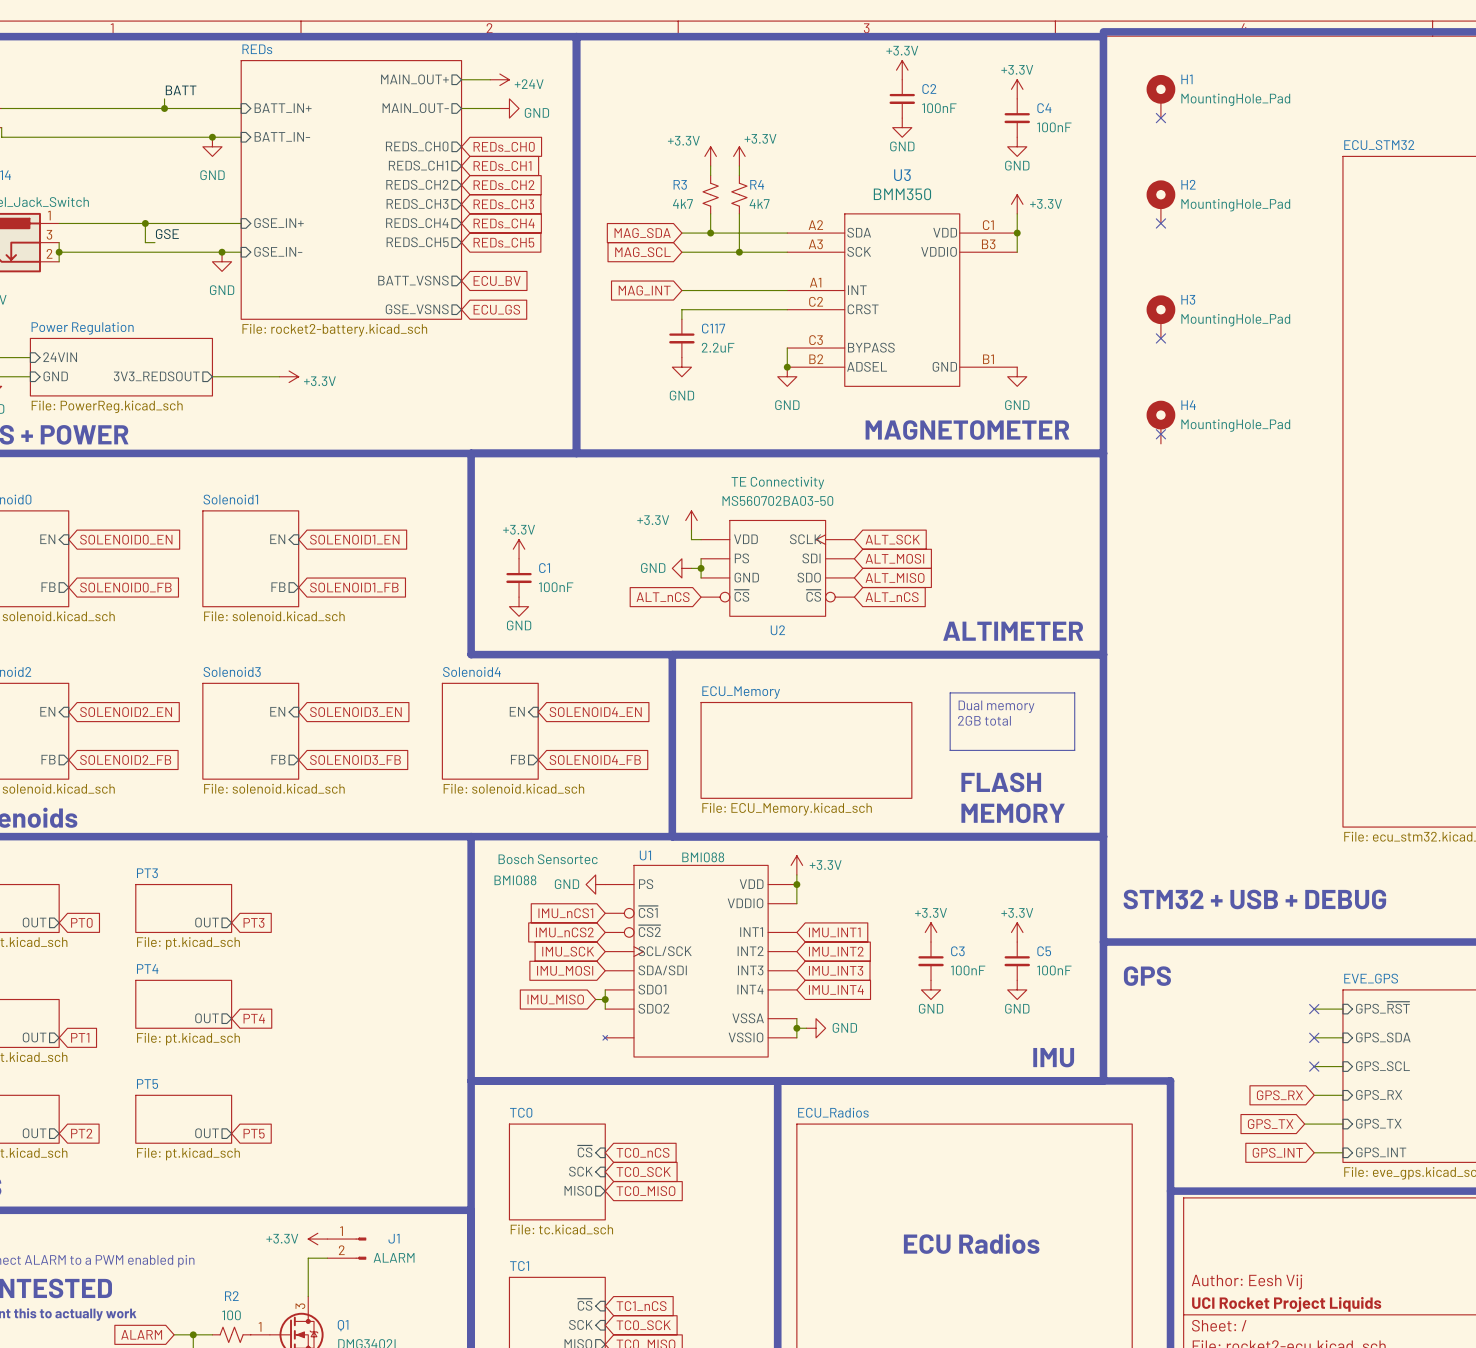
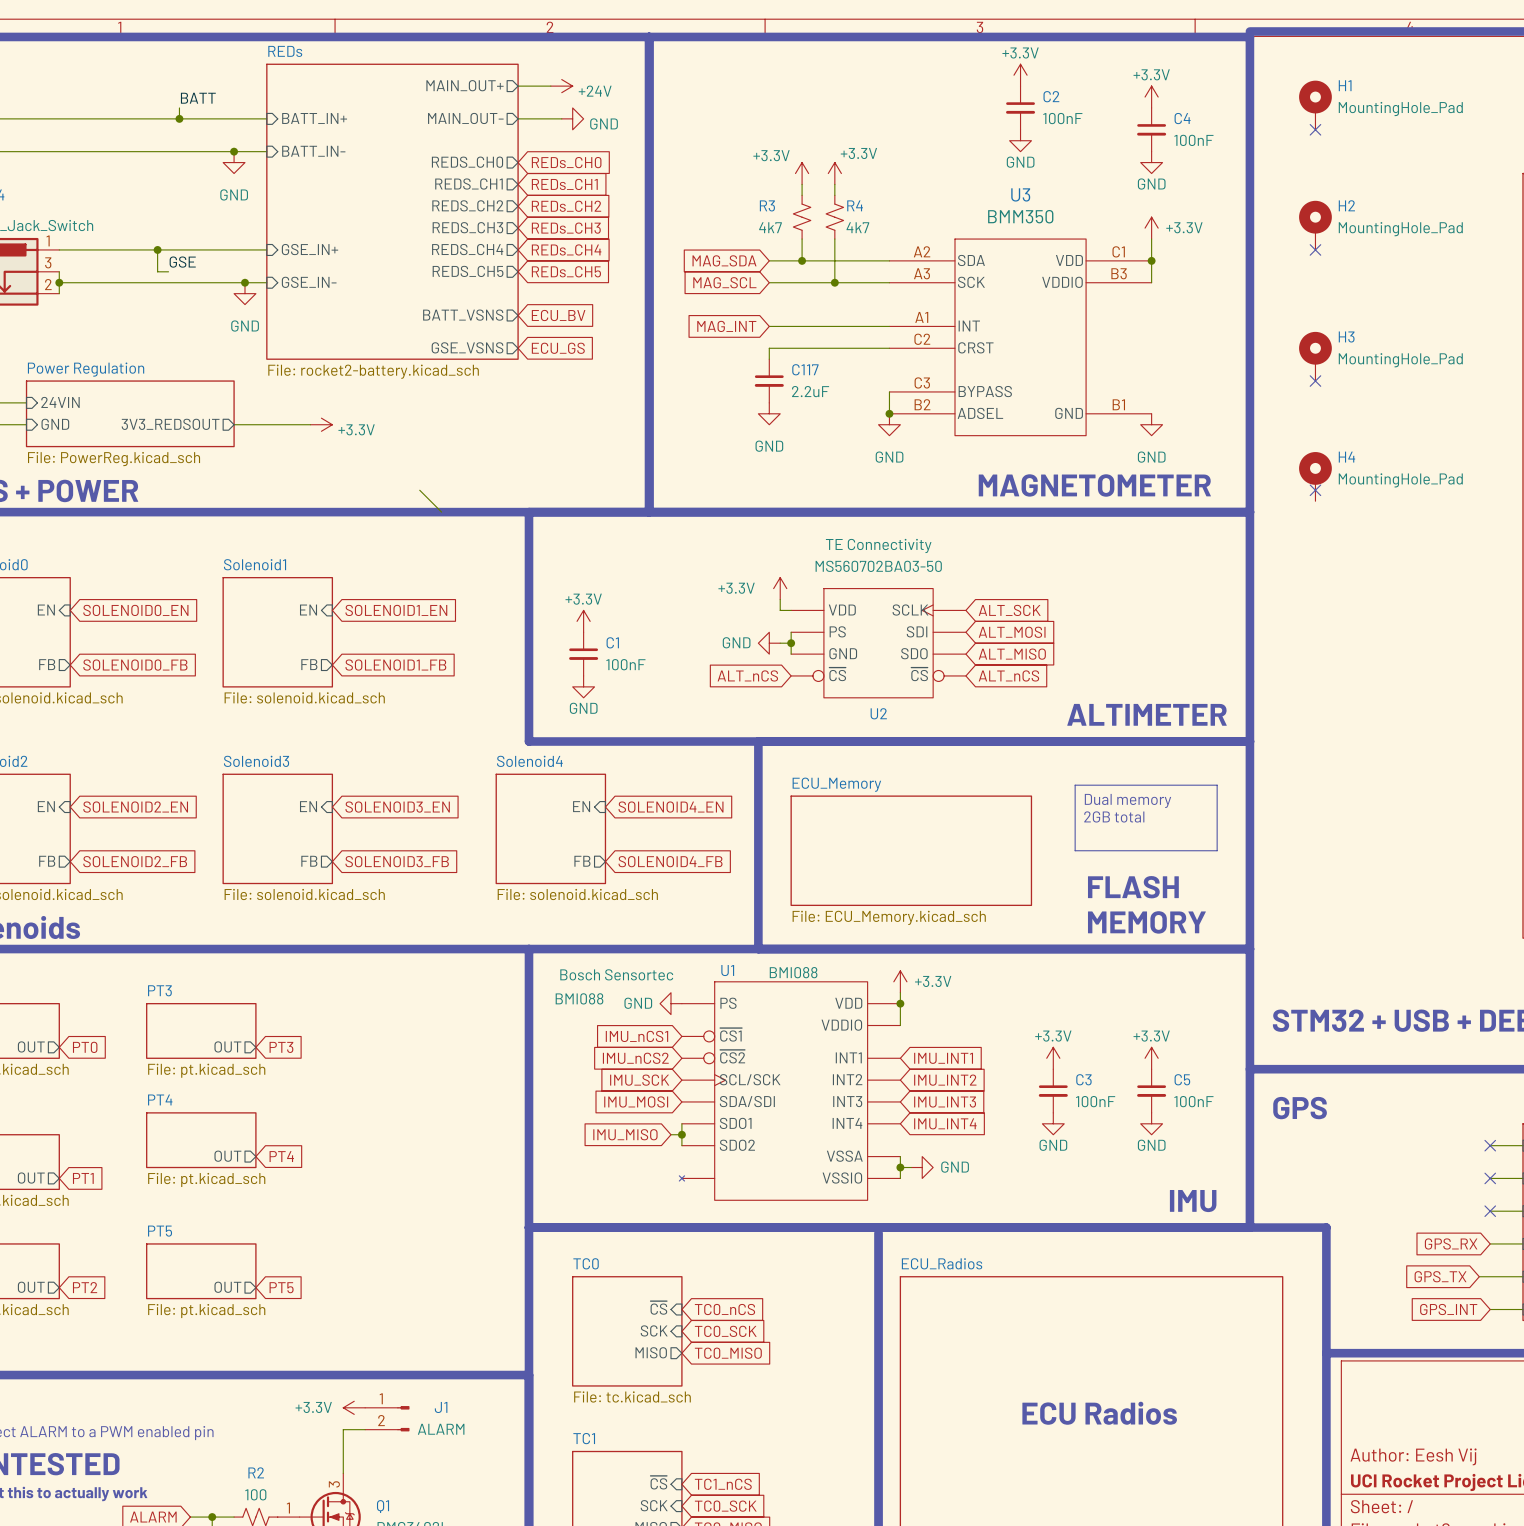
wire: none -> (419, 490) (441, 512)

